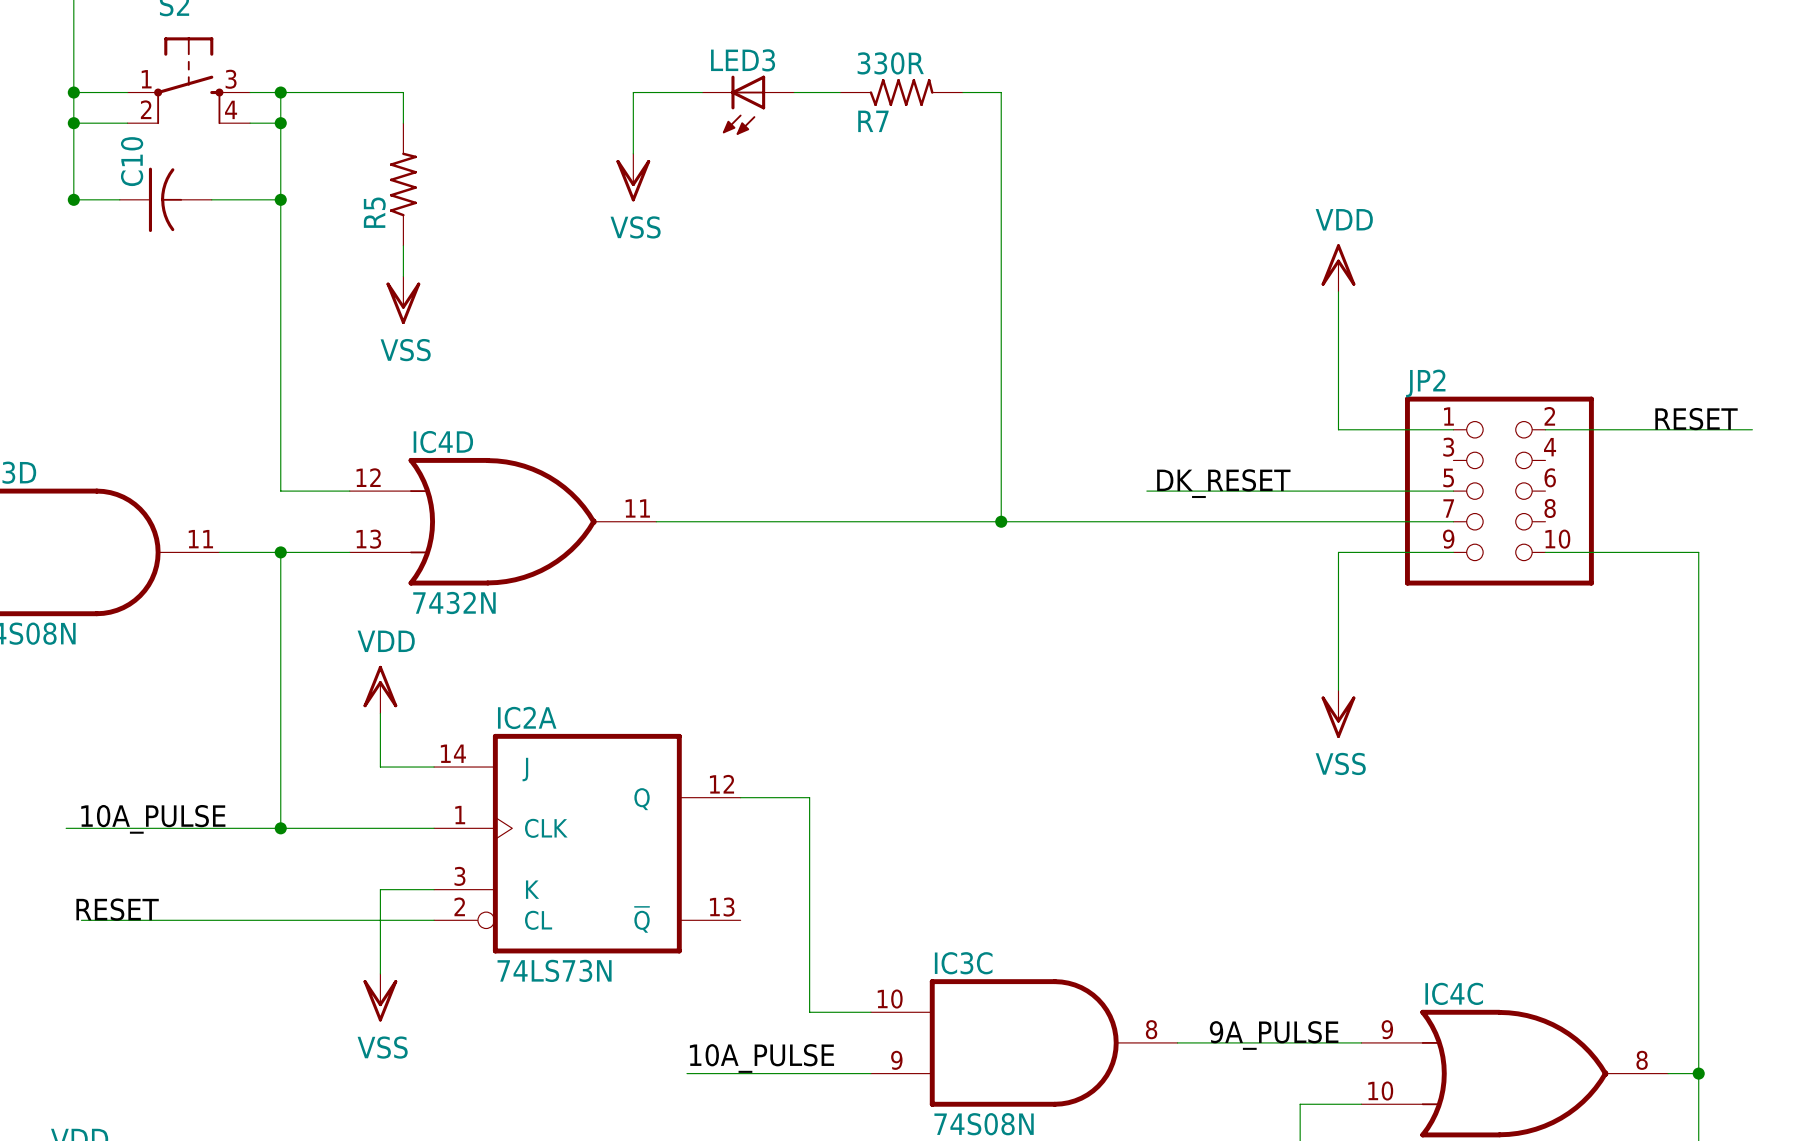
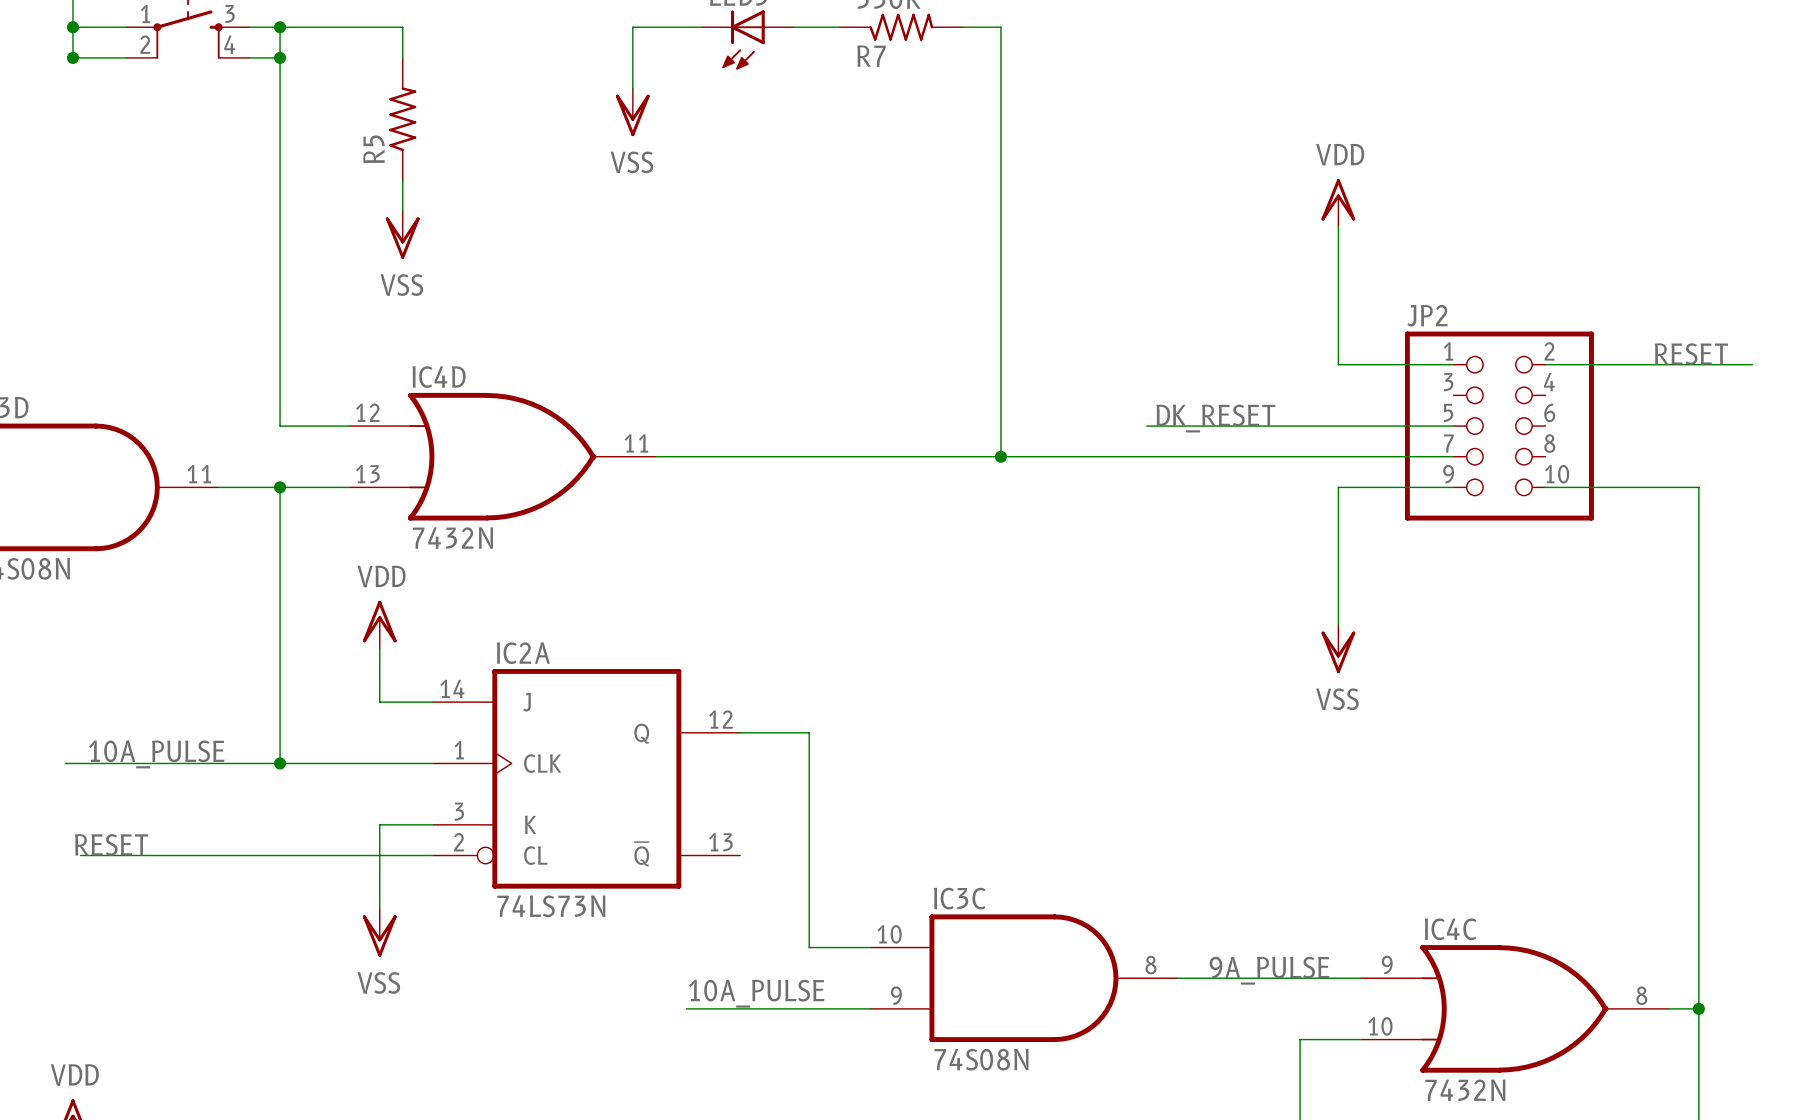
wire: (73, 123) (73, 199) (119, 199) -> none
junction: (73, 199) -> none
C10: (165, 199) -> none
wire: (211, 199) (280, 199) -> none
junction: (280, 199) -> none

